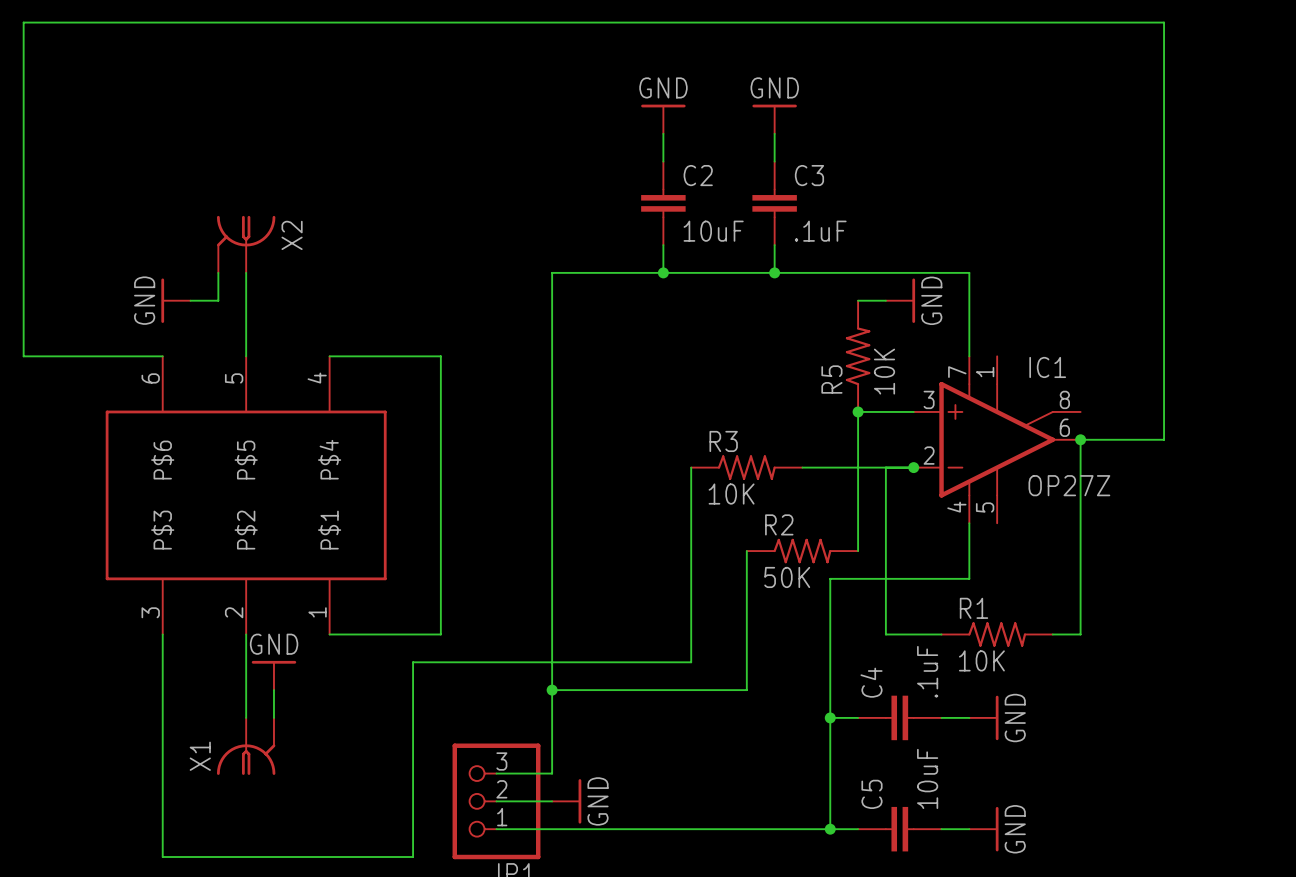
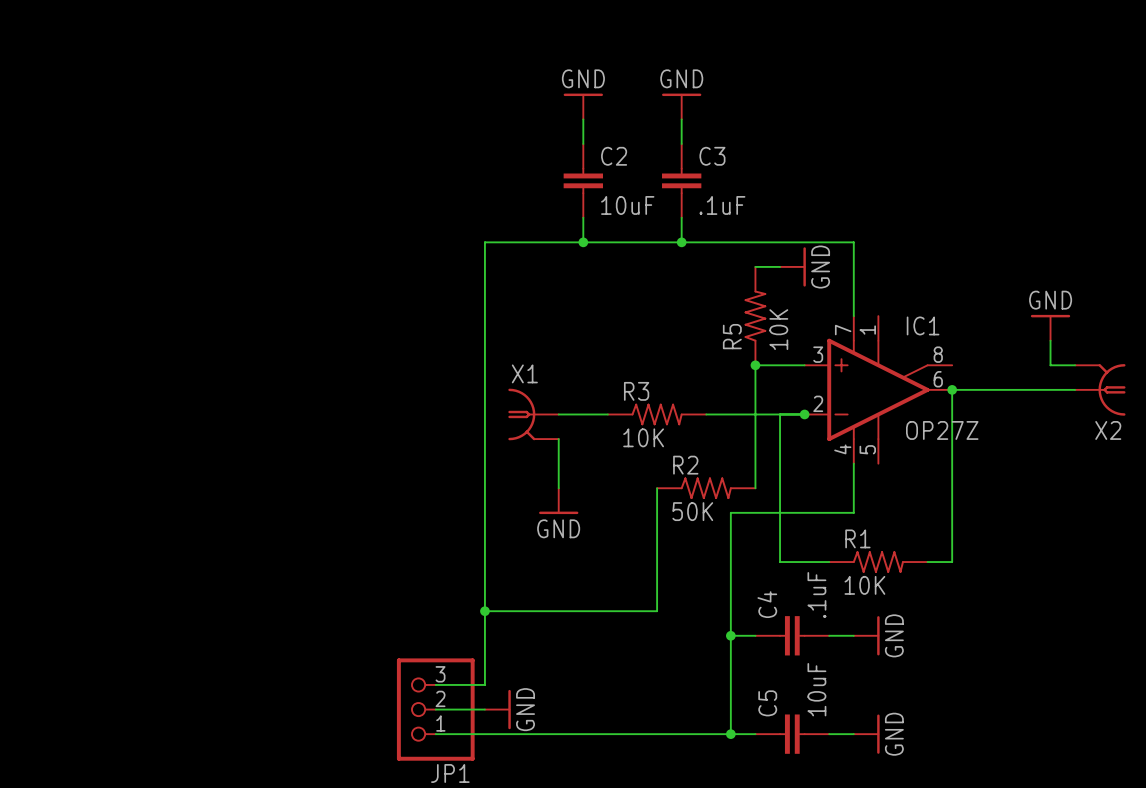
X2 rotation: 0° (246, 231) -> 90° clockwise (1111, 389)
X2 position: (246, 244) -> (1100, 389)
wire: (218, 272) (218, 300) (190, 300) -> none
wire: (246, 272) (246, 356) -> none
power symbol: GND (175, 300) -> none
wire: (162, 356) (23, 356) (23, 22) (1164, 22) (1164, 439) -> (1075, 389) (1025, 389)
wire: (329, 356) (440, 356) (440, 634) (329, 634) -> none
power symbol: none -> GND (1050, 327)
wire: none -> (1050, 340) (1050, 365) (1075, 365)
wire: (691, 467) (691, 662) (413, 662) (413, 857) (162, 857) (162, 634) -> (607, 414) (558, 414)
part: (246, 495) -> none
wire: none -> (558, 439) (558, 488)
power symbol: none -> GND (558, 501)
wire: (246, 634) (246, 717) -> none
power symbol: GND (273, 675) -> none
wire: (273, 690) (273, 717) -> none
X1 position: (246, 746) -> (533, 414)
X1 rotation: 0° (246, 759) -> 90° clockwise (521, 414)

